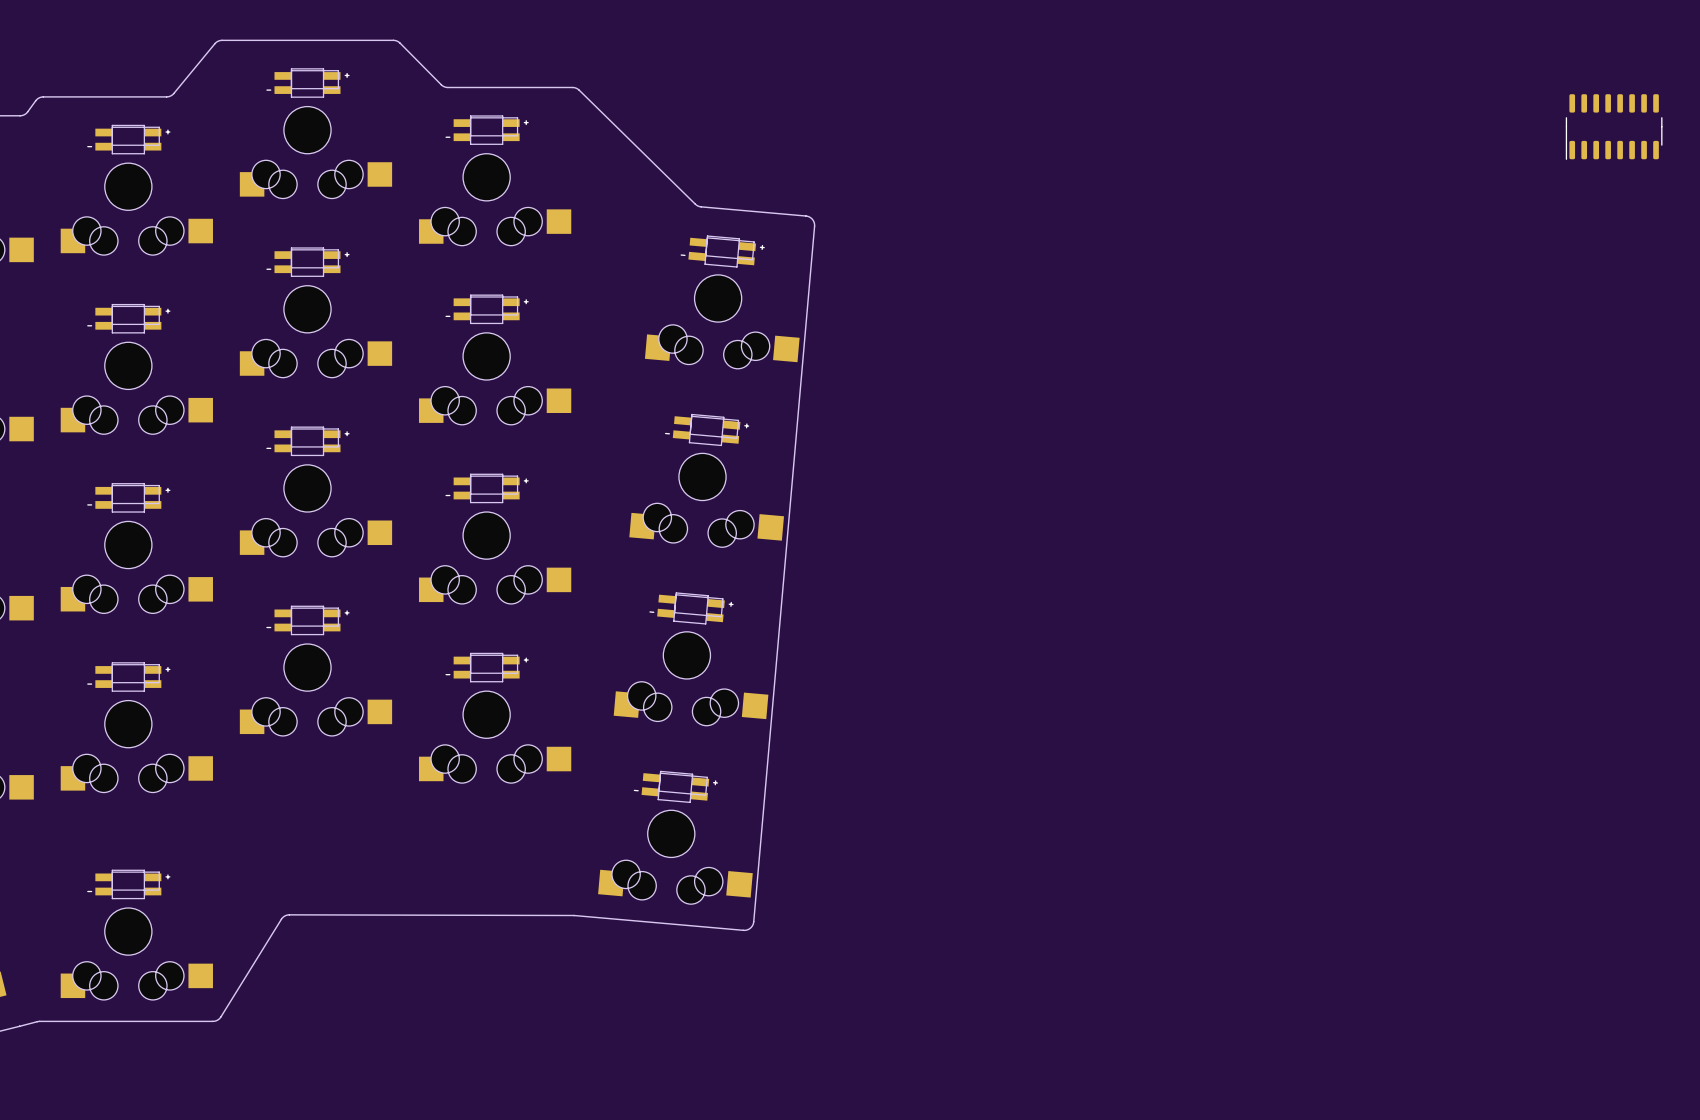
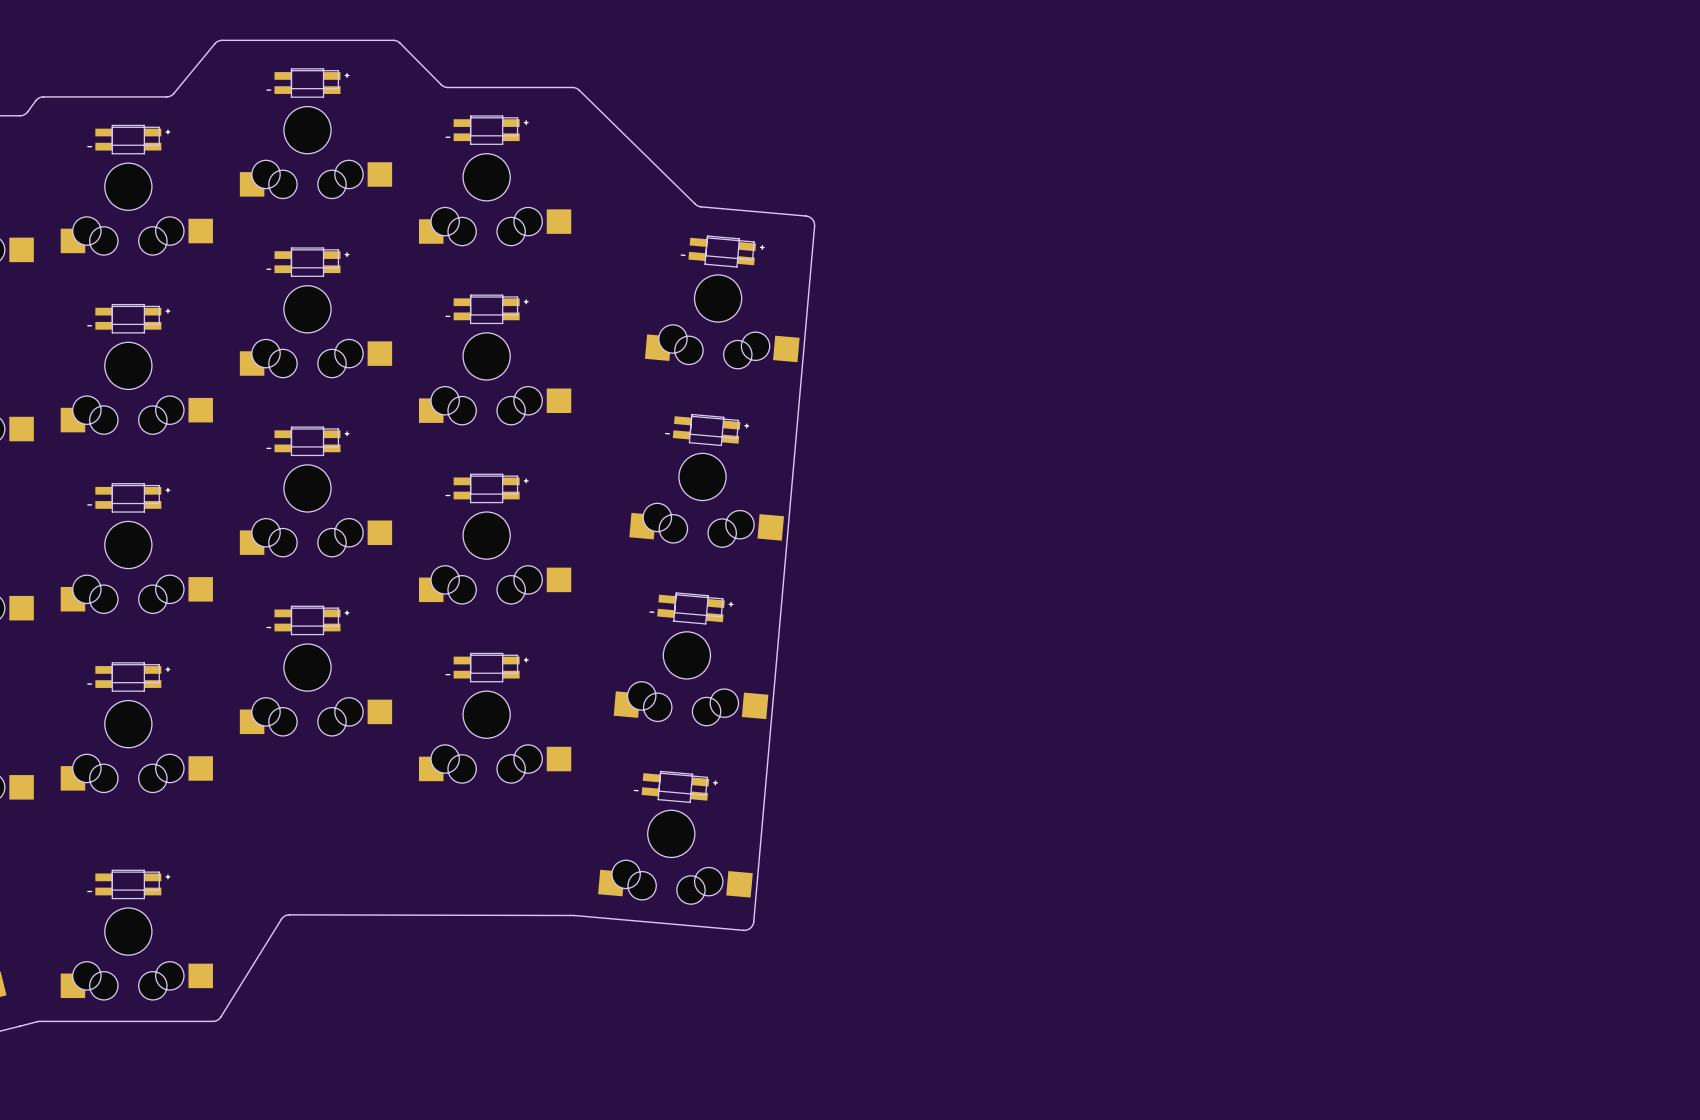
part: (1614, 127) -> none

